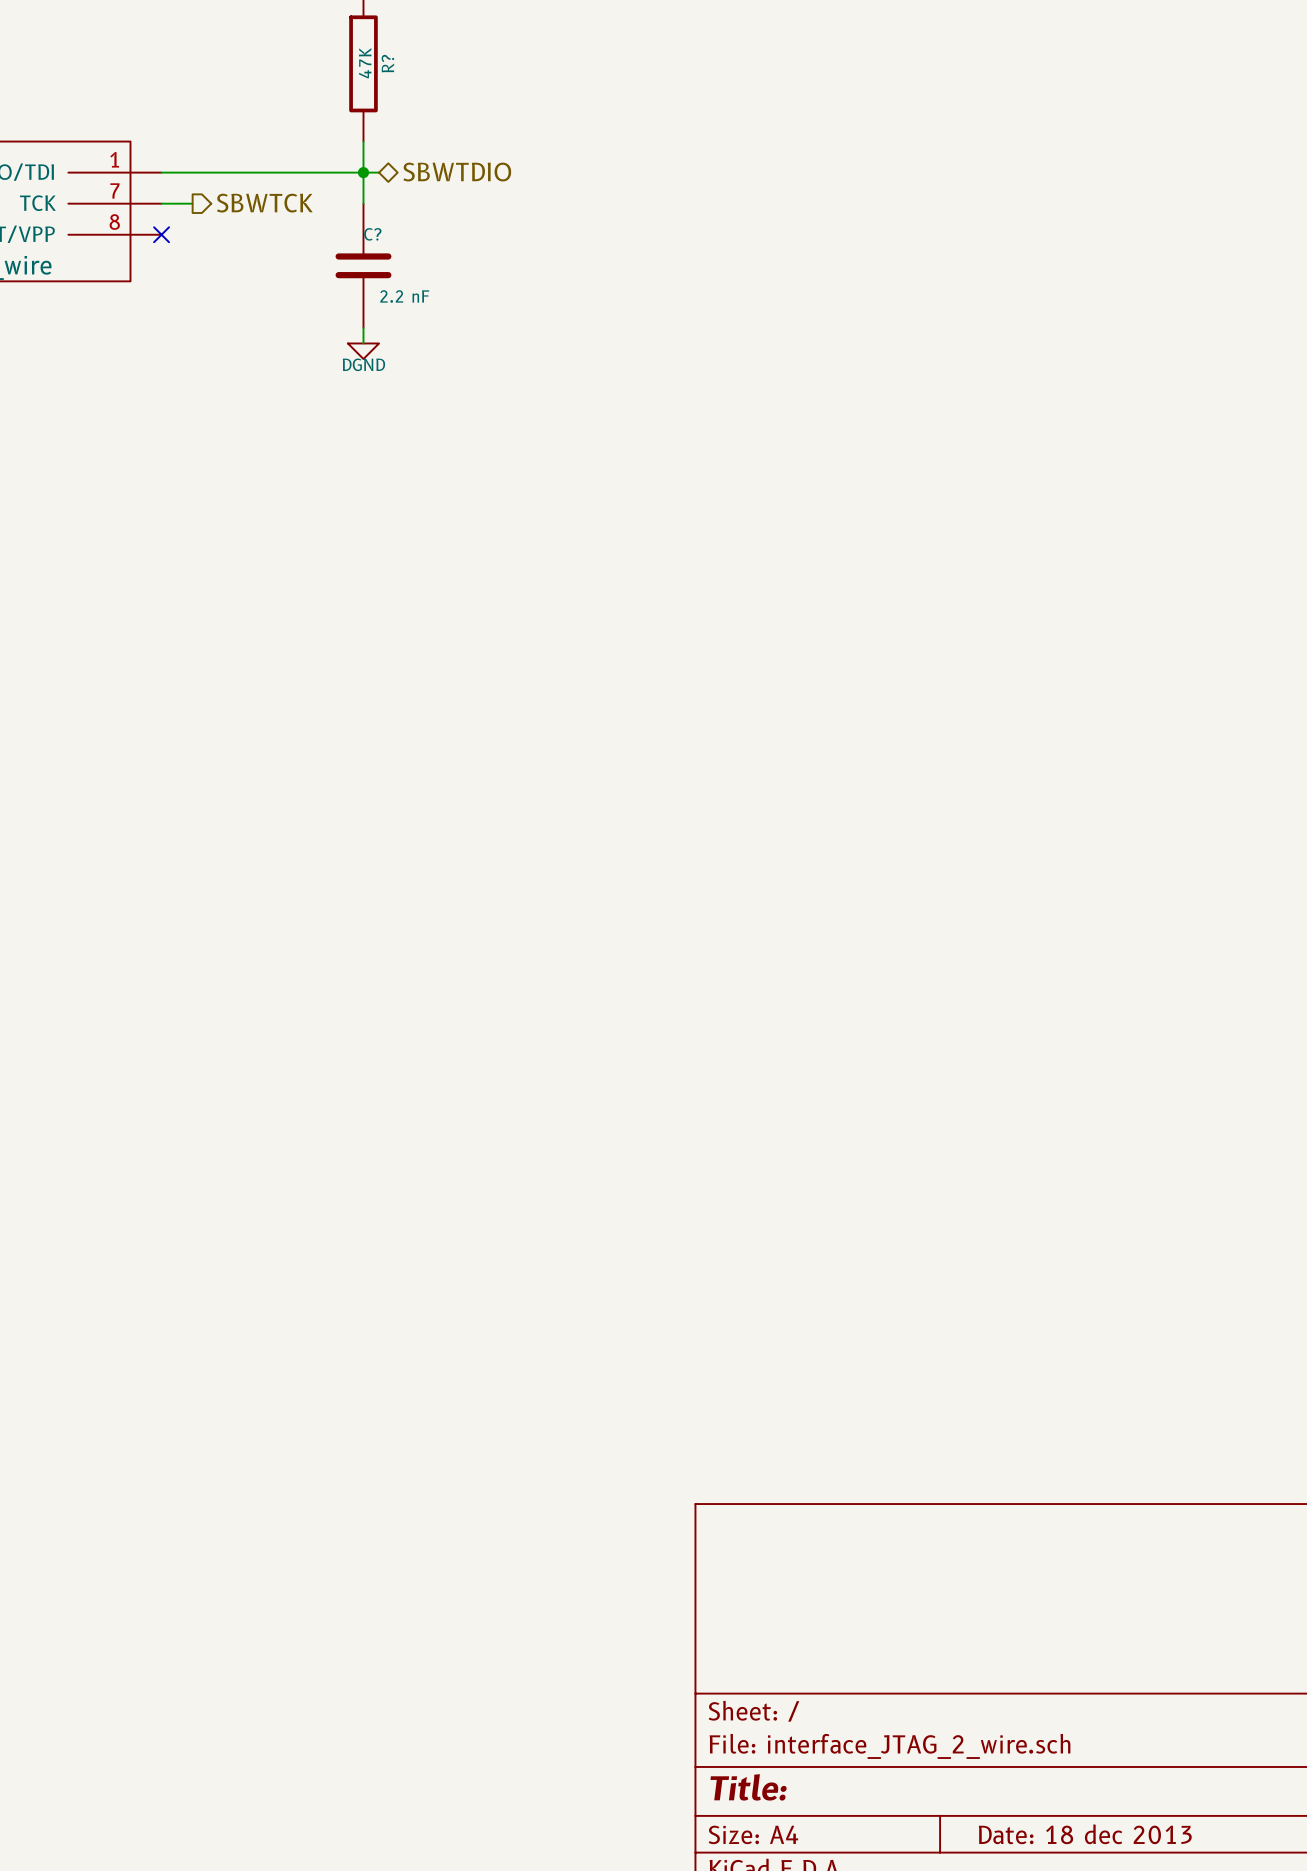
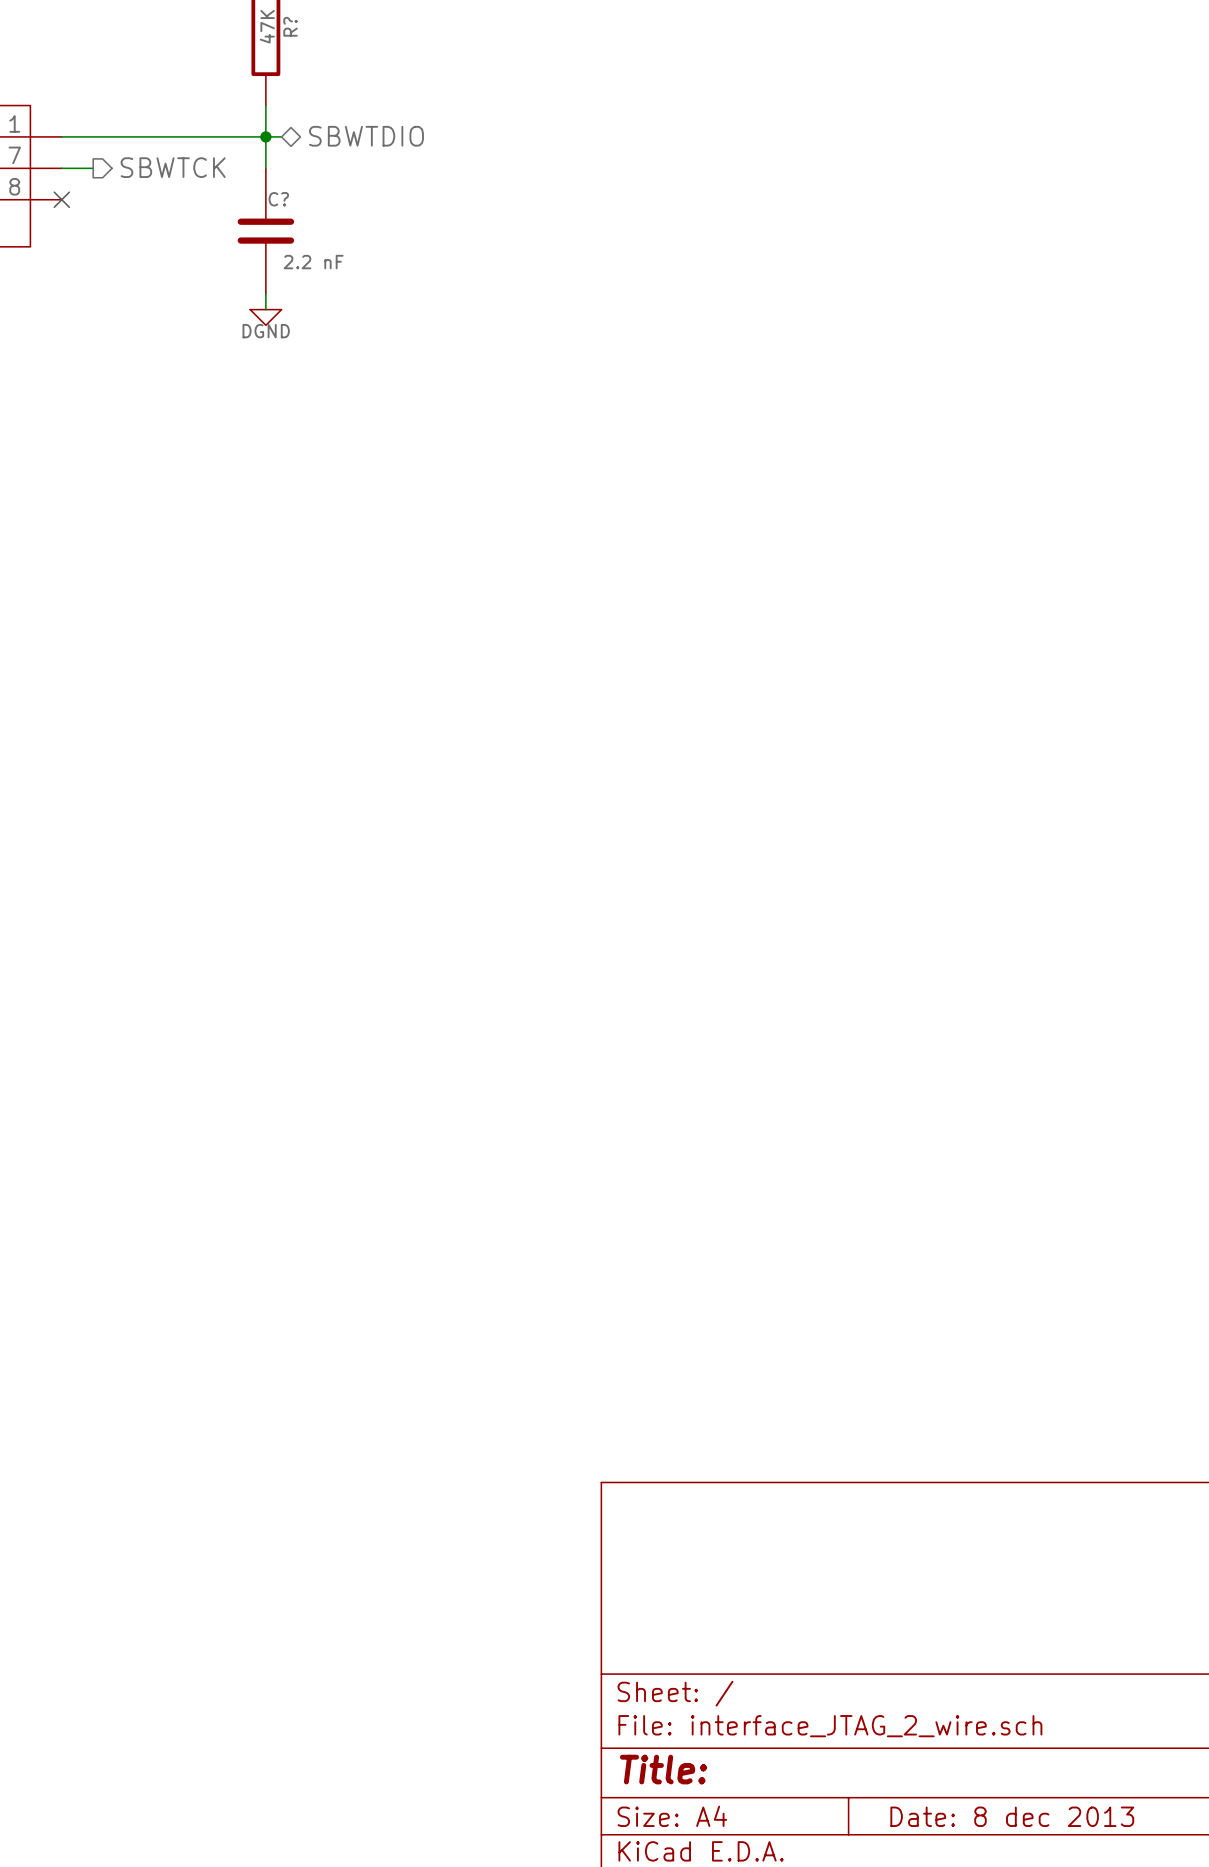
title block: Date: 18 dec 2013 (1085, 1834) -> Date: 8 dec 2013 (1012, 1816)

